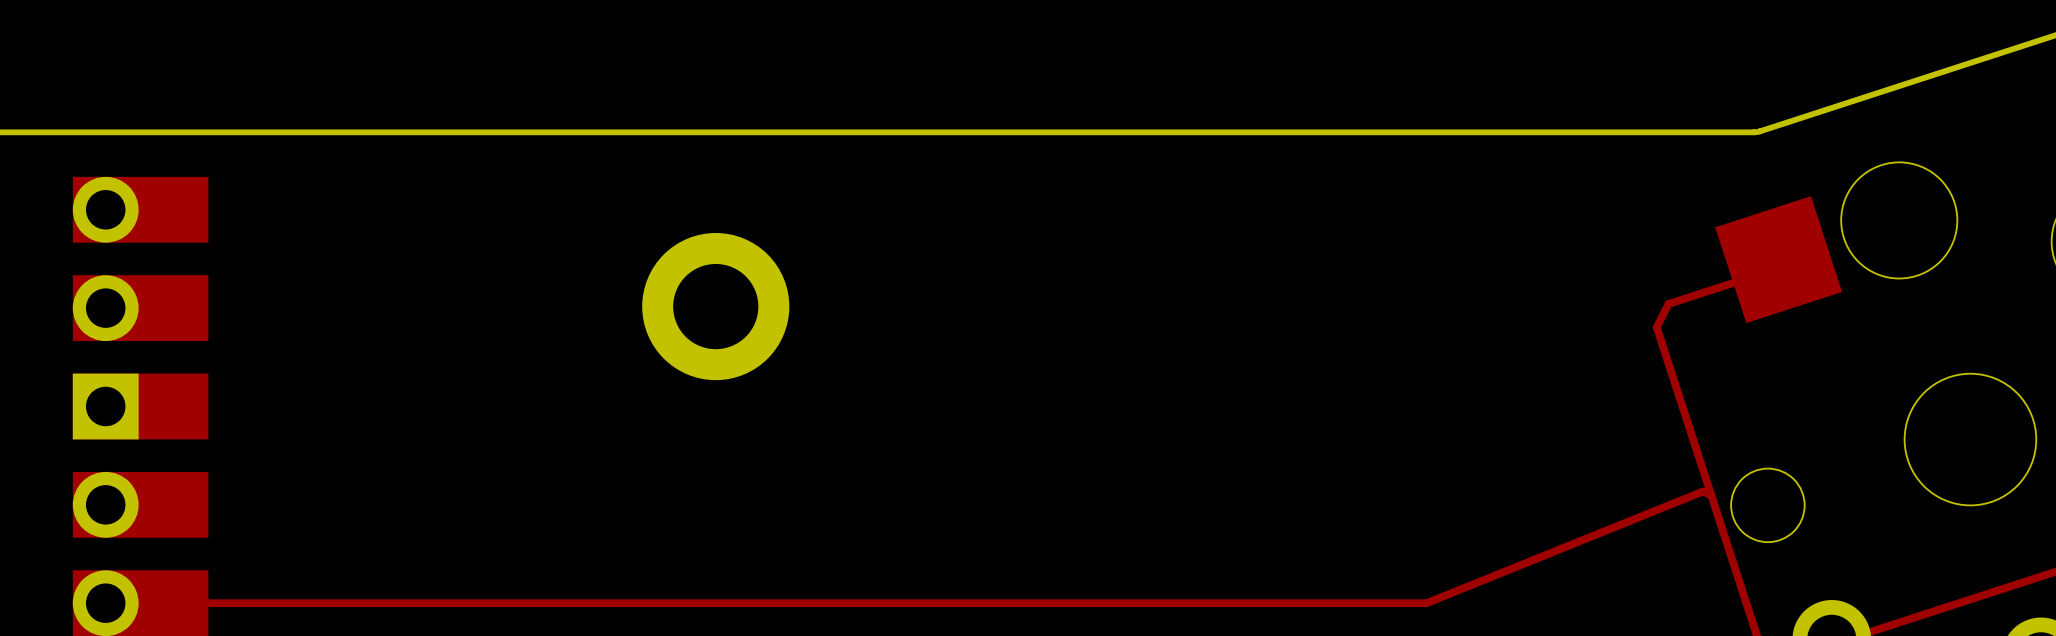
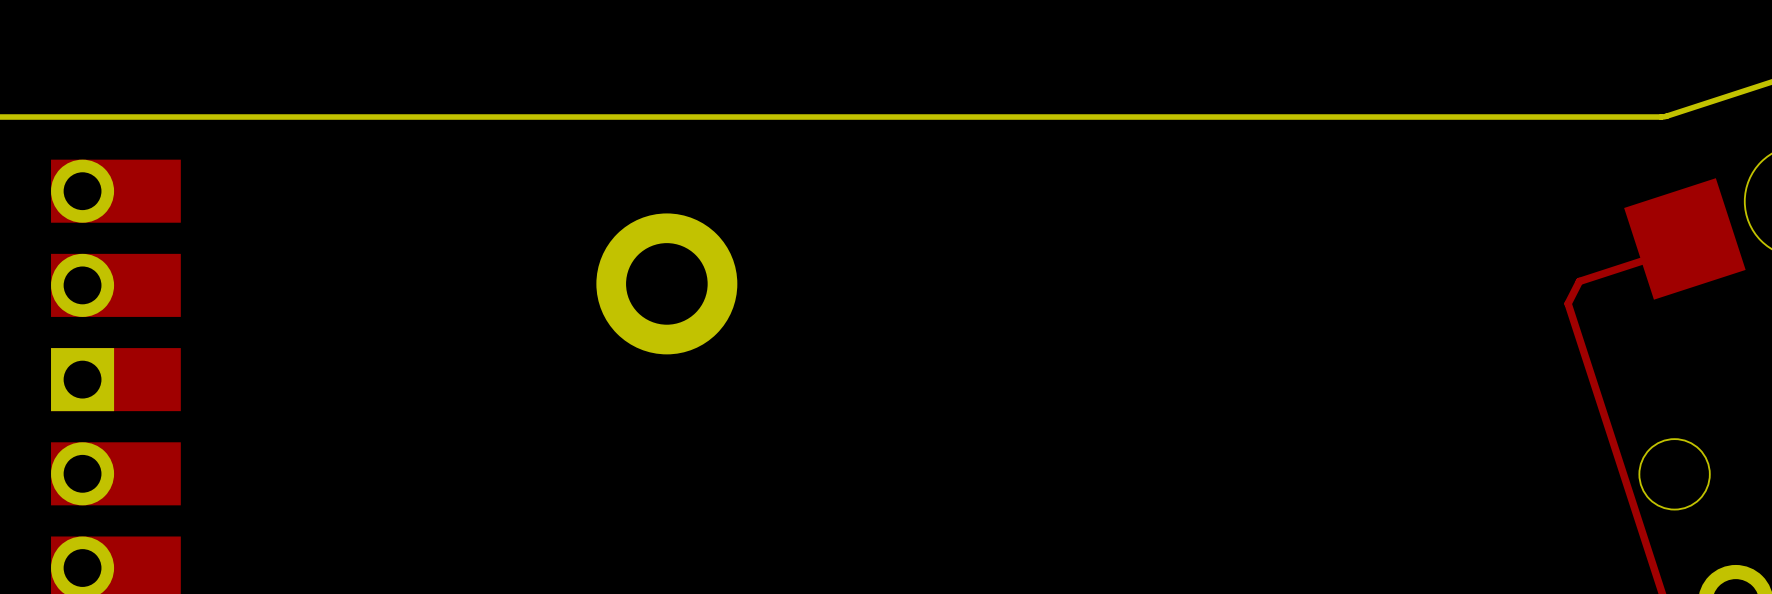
top track: (1711, 495) (1702, 491) (1426, 603) (105, 603) -> none

